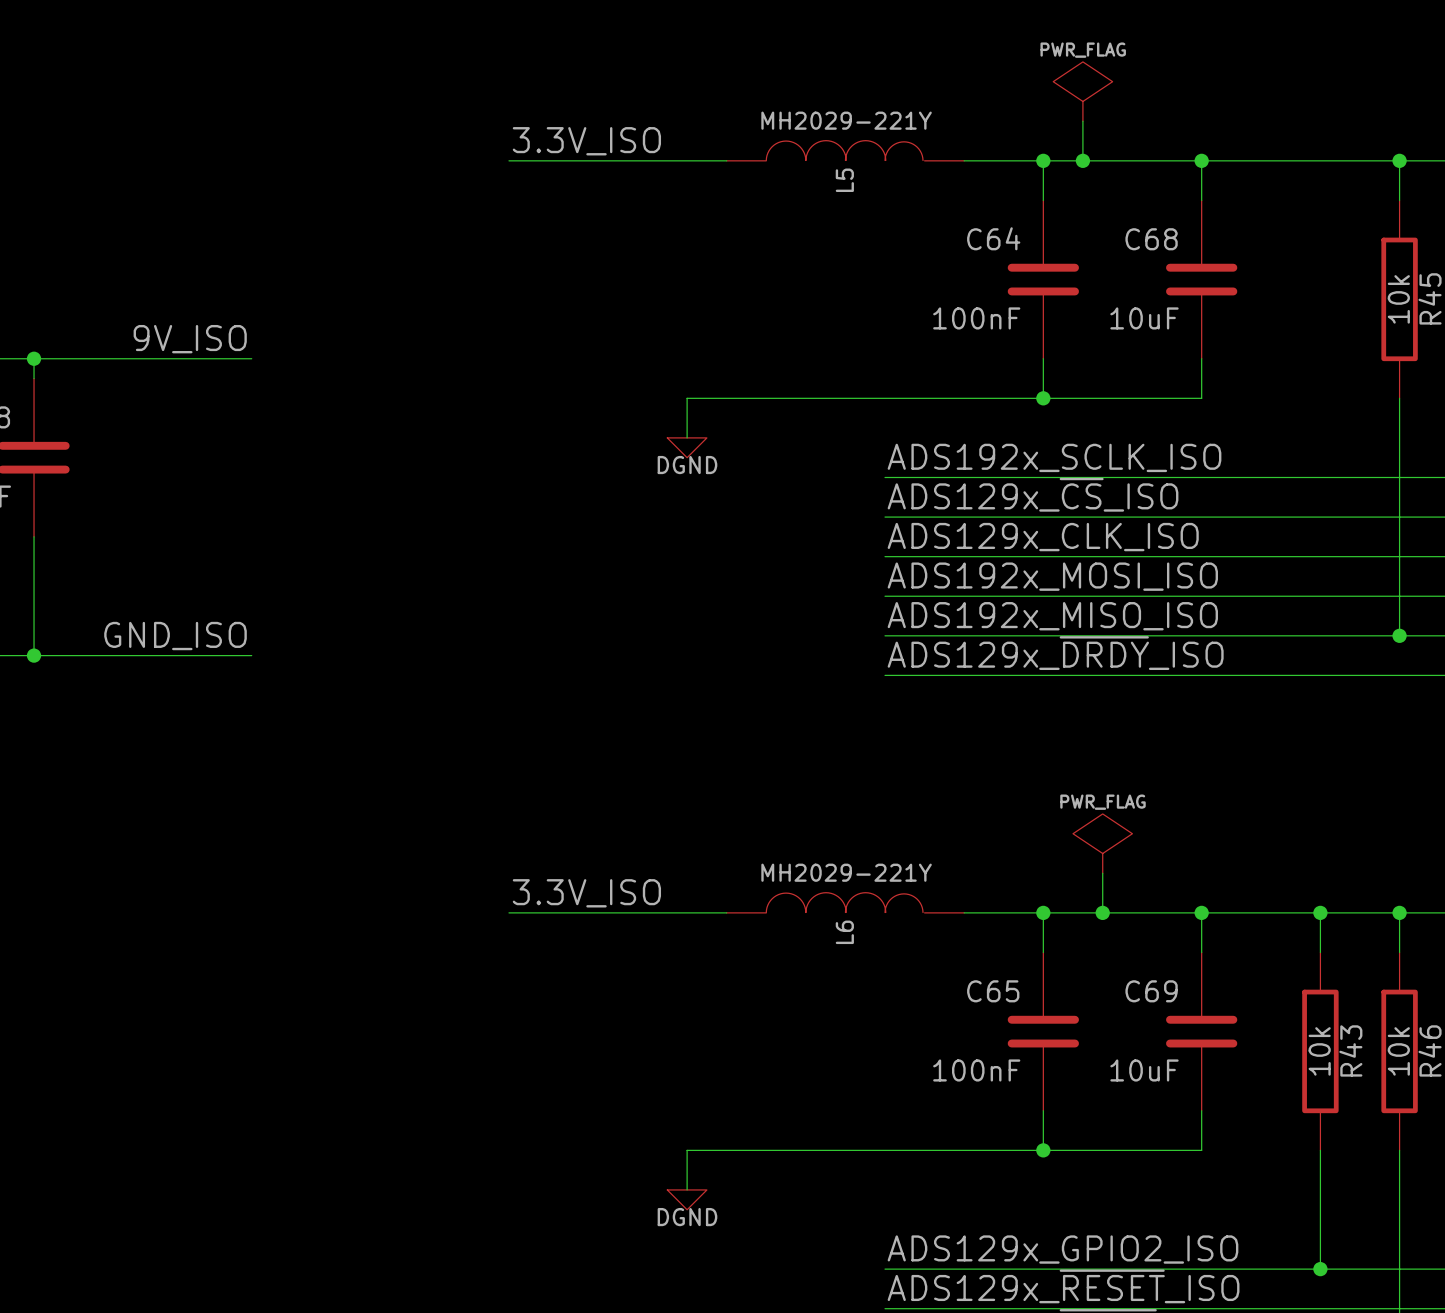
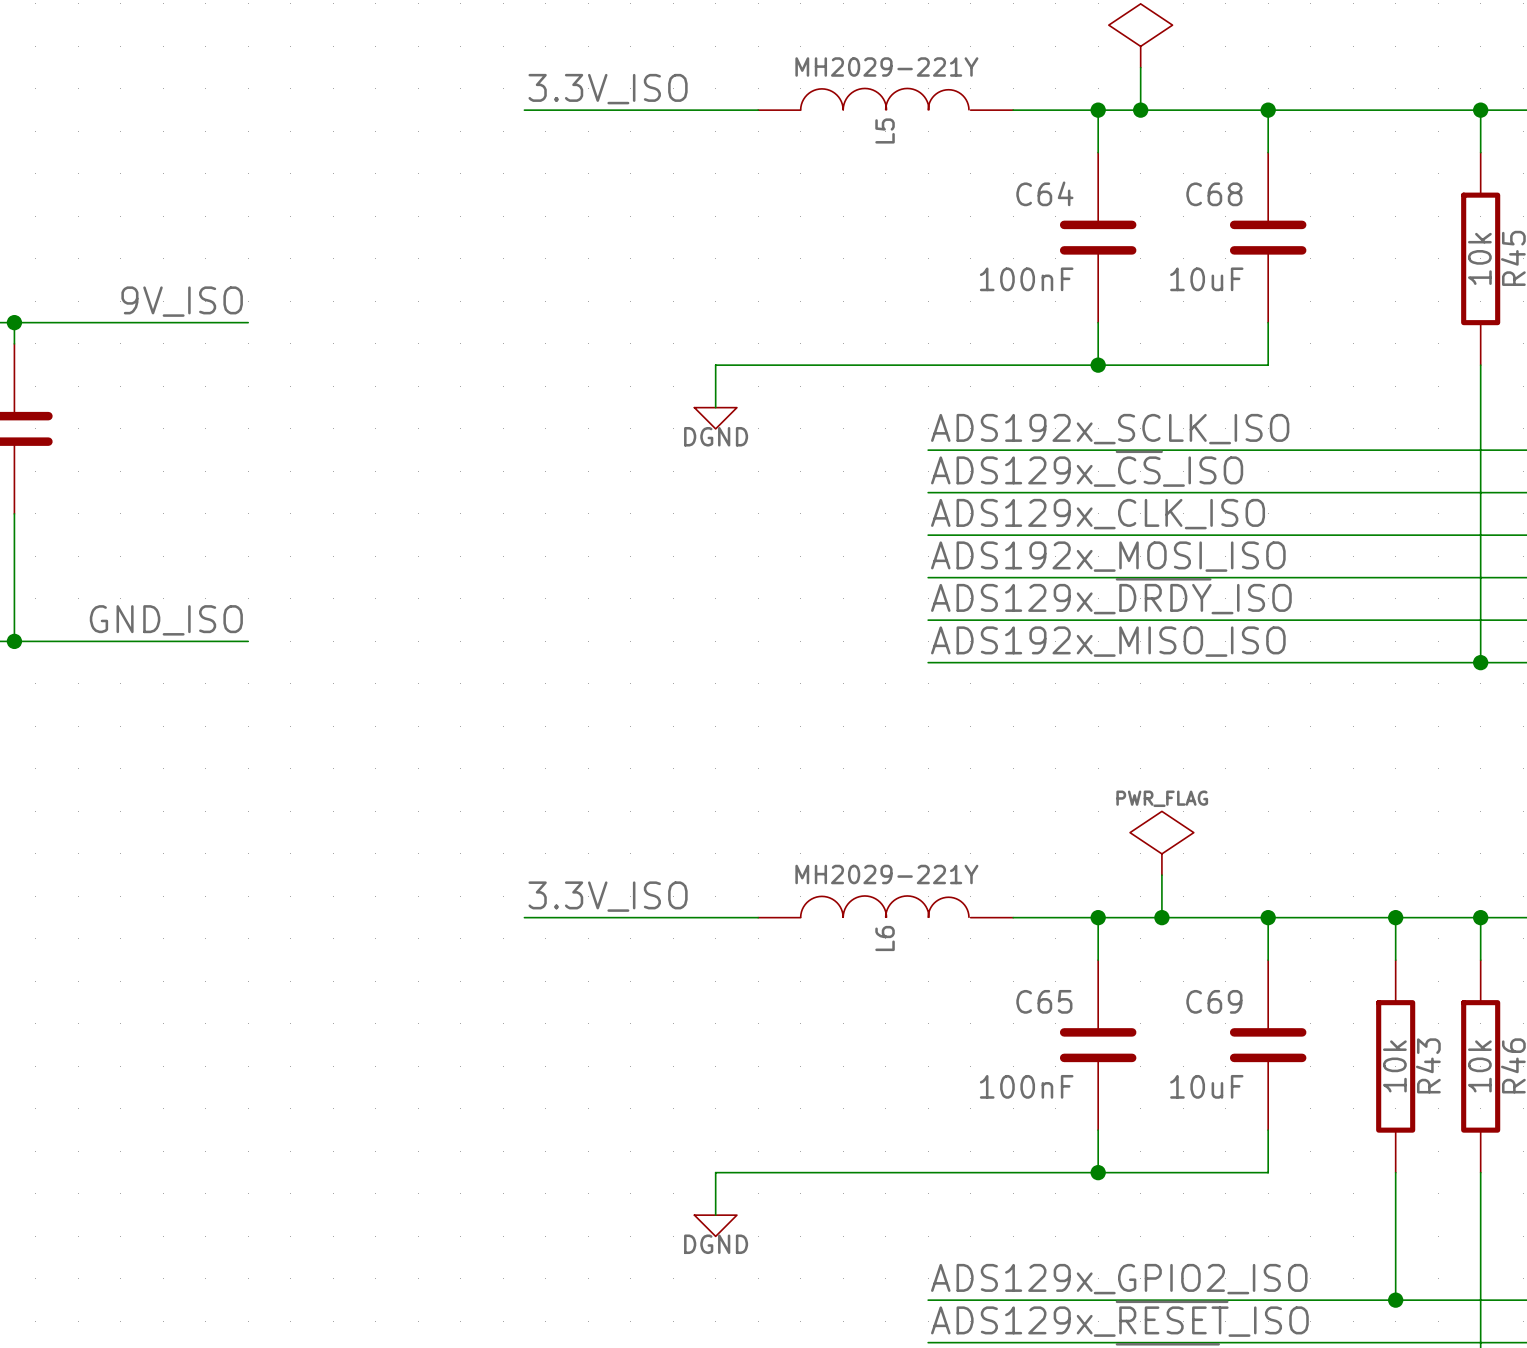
label: ADS192x_MISO_ISO (1052, 616) -> ADS129x_~{DRDY}_ISO (1111, 596)
wire: none -> (1480, 620) (1480, 662)
junction position: (1399, 635) -> (1480, 662)
label: ADS129x_~{DRDY}_ISO (1055, 653) -> ADS192x_MISO_ISO (1108, 641)

